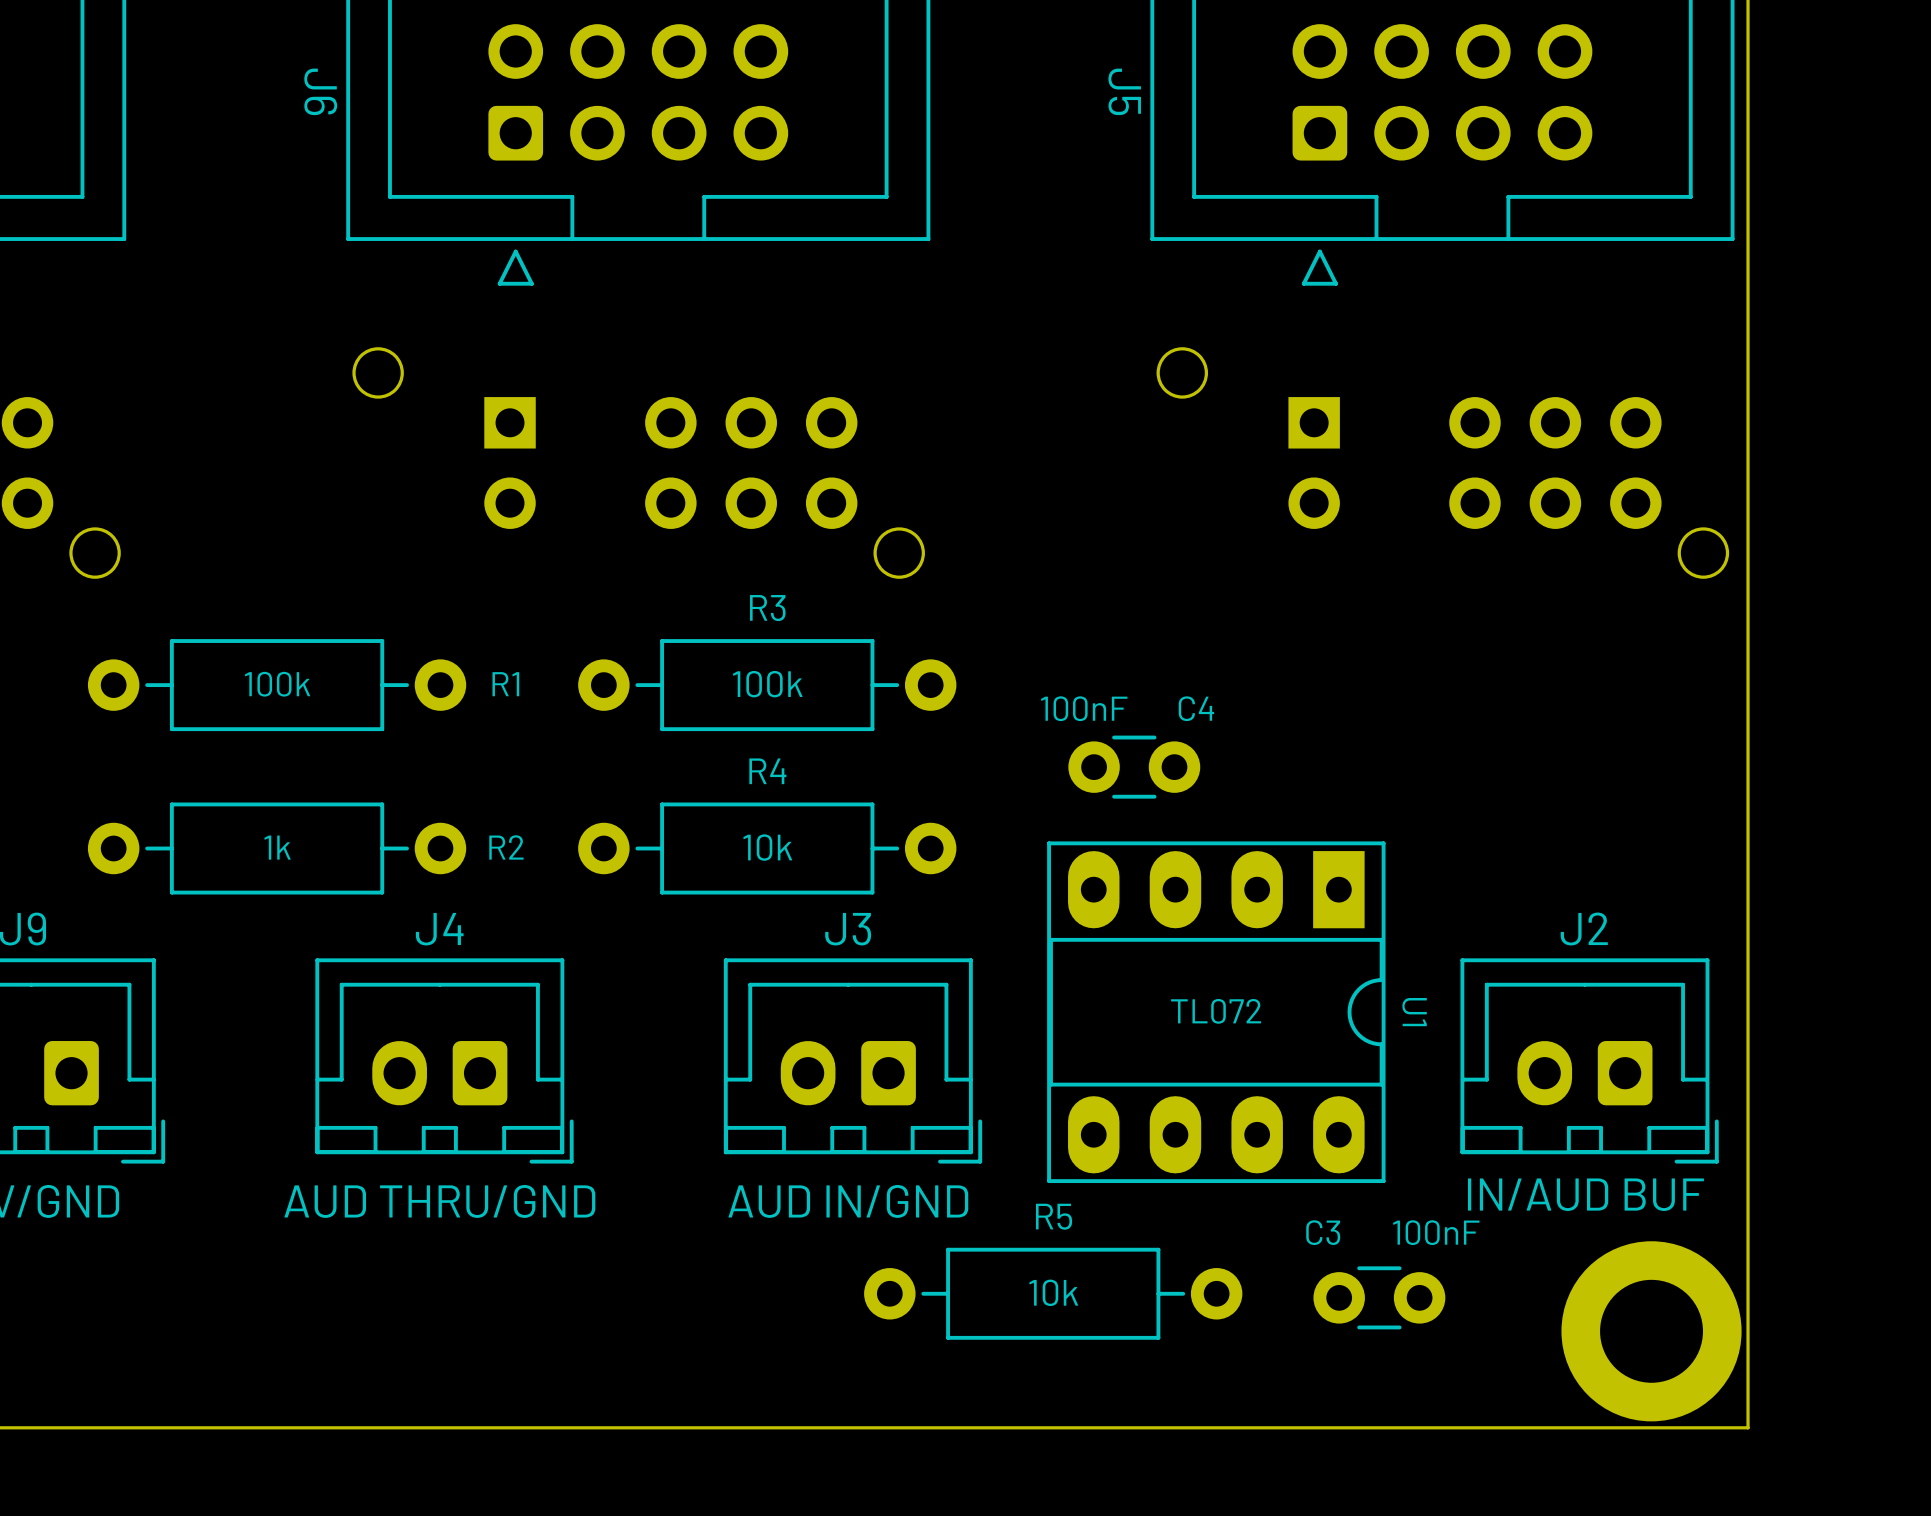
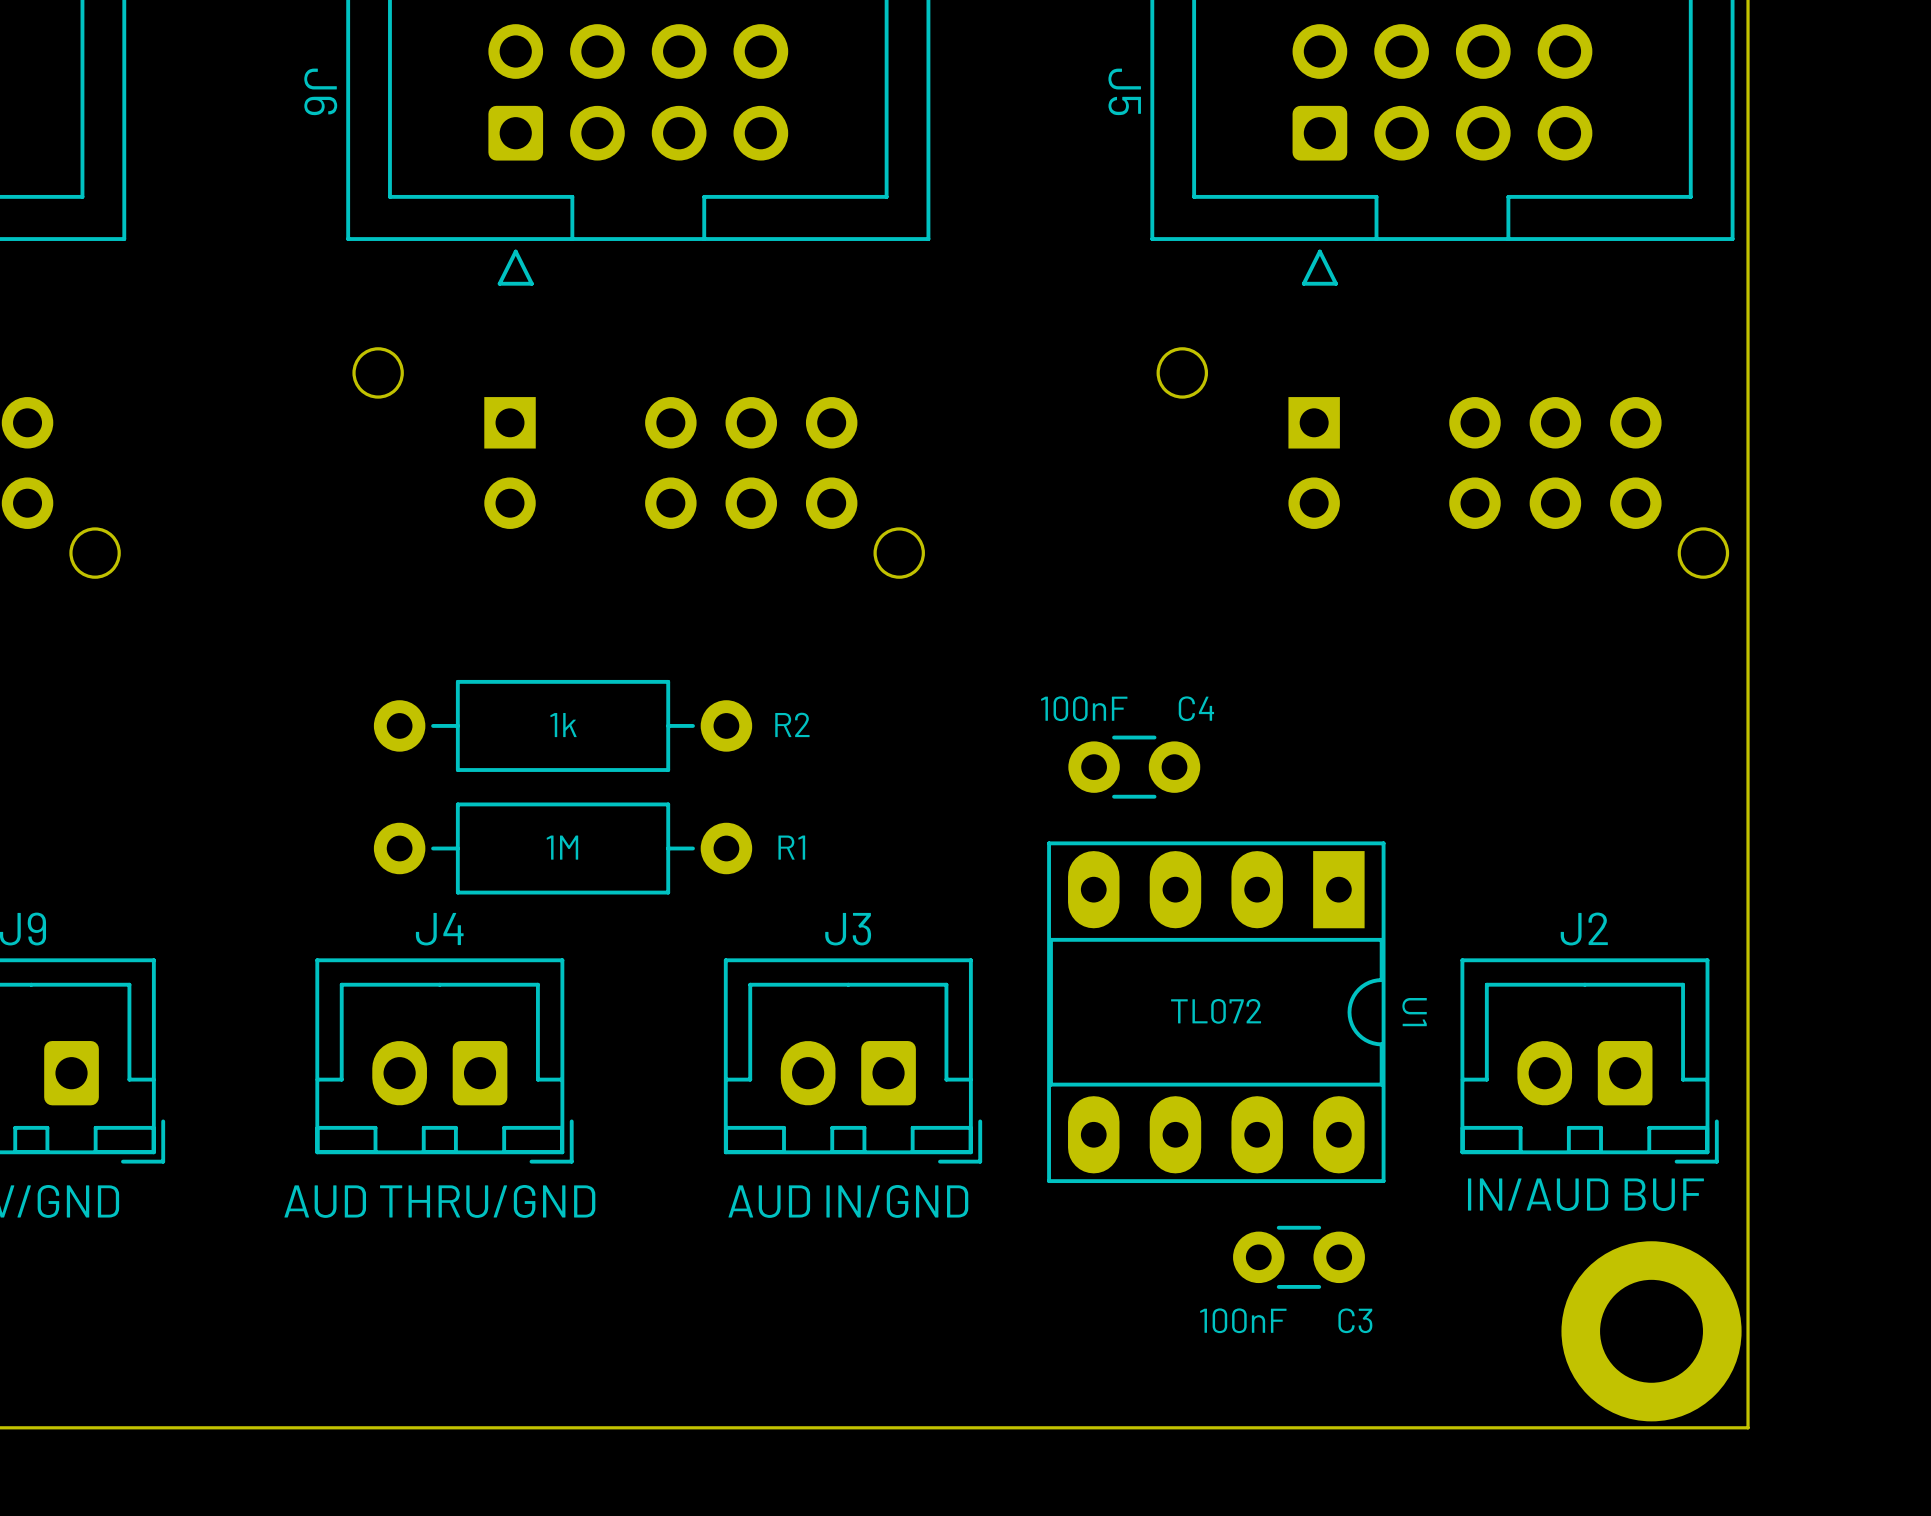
R1 value: 100k (277, 684) -> 1M (562, 847)
R1 position: (277, 685) -> (563, 848)
R3: 100k (767, 685) -> none
R2 position: (277, 848) -> (563, 725)
R4: 10k (767, 848) -> none
C3 name position: C3 (1323, 1232) -> C3 (1355, 1320)
C3 value position: 100nF (1436, 1232) -> 100nF (1243, 1320)
R5: 10k (1053, 1293) -> none
C3 position: (1379, 1297) -> (1298, 1257)

